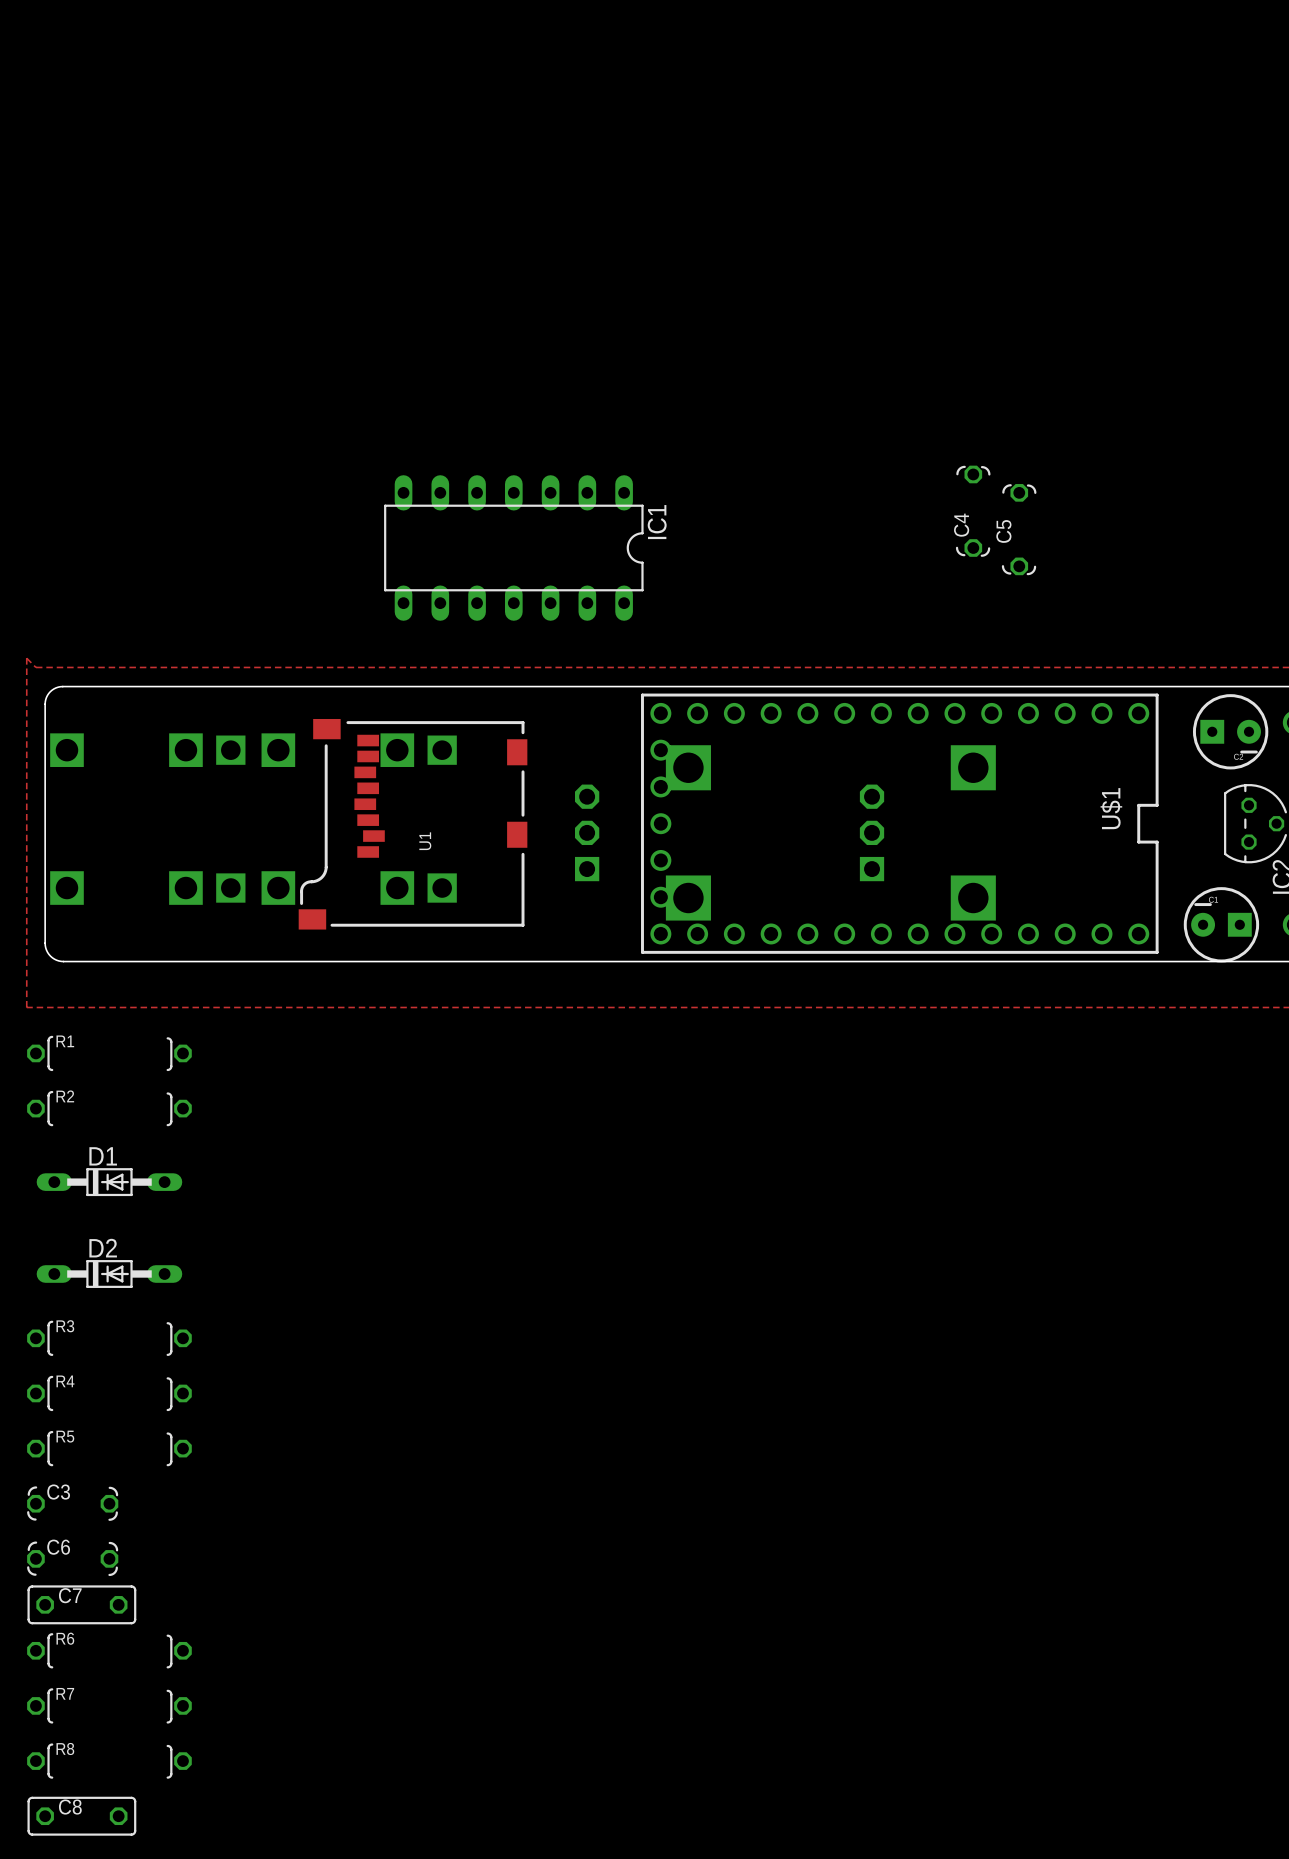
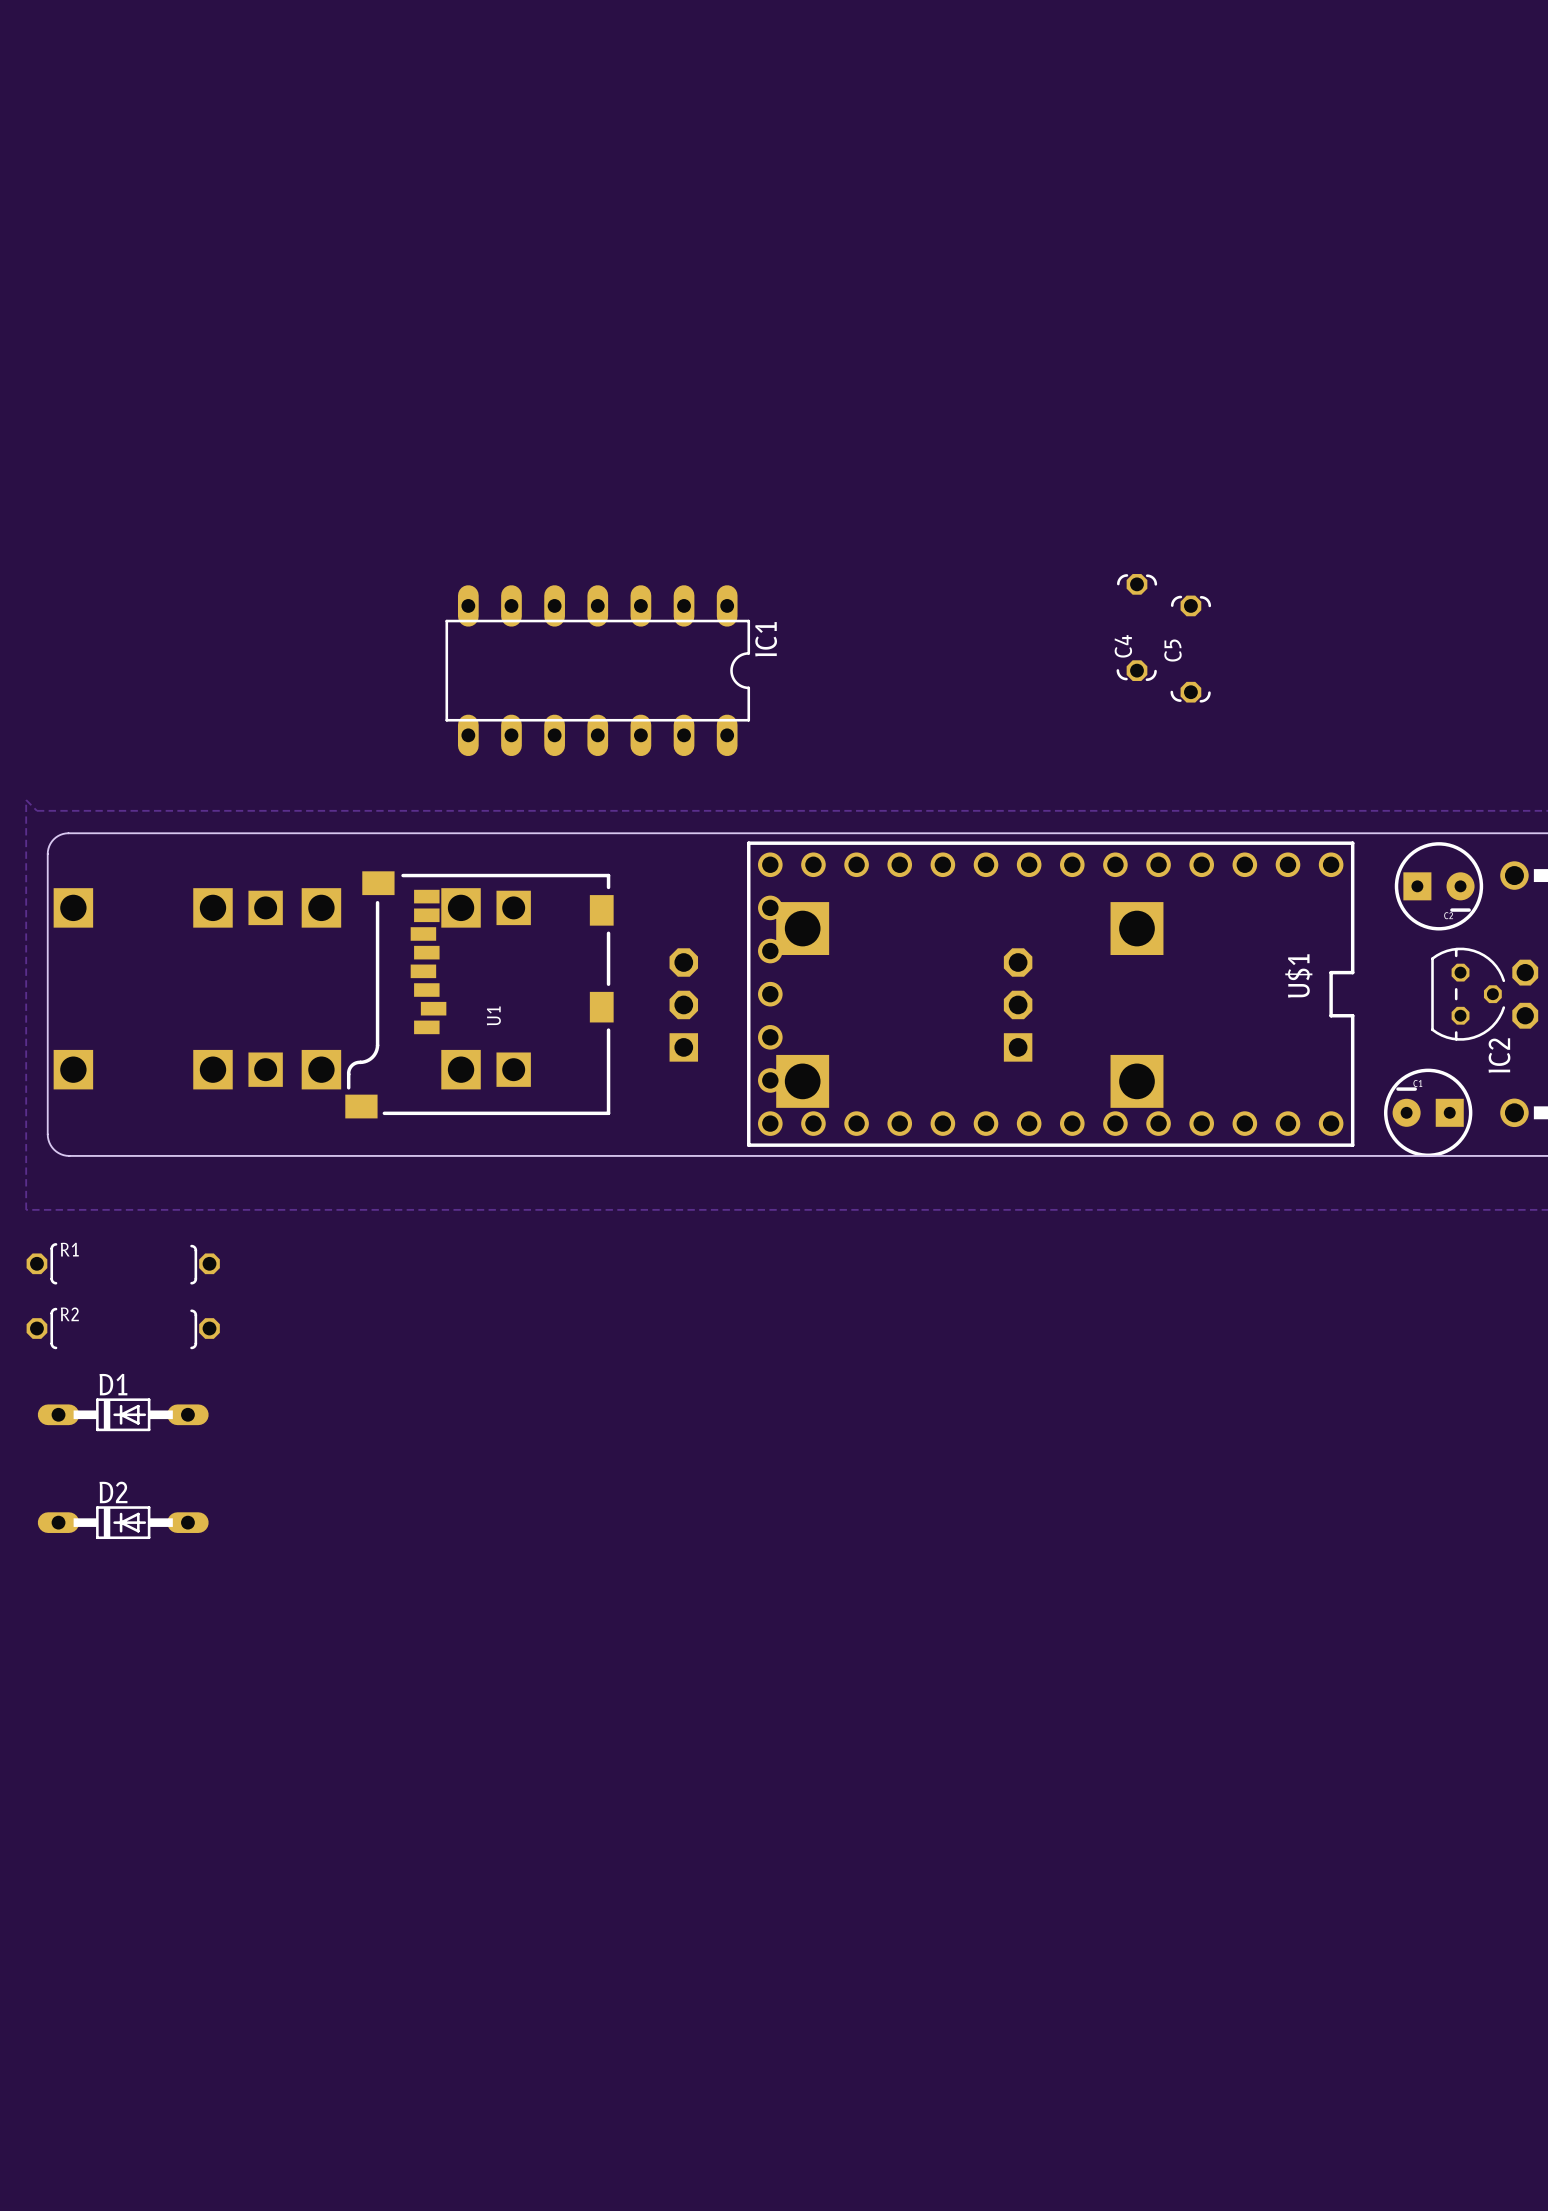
R3: (109, 1338) -> none
R4: (109, 1393) -> none
R5: (109, 1448) -> none
C3: (72, 1503) -> none
C6: (72, 1558) -> none
C7: (81, 1604) -> none
R6: (109, 1650) -> none
R7: (109, 1705) -> none
R8: (109, 1761) -> none
C8: (81, 1816) -> none

